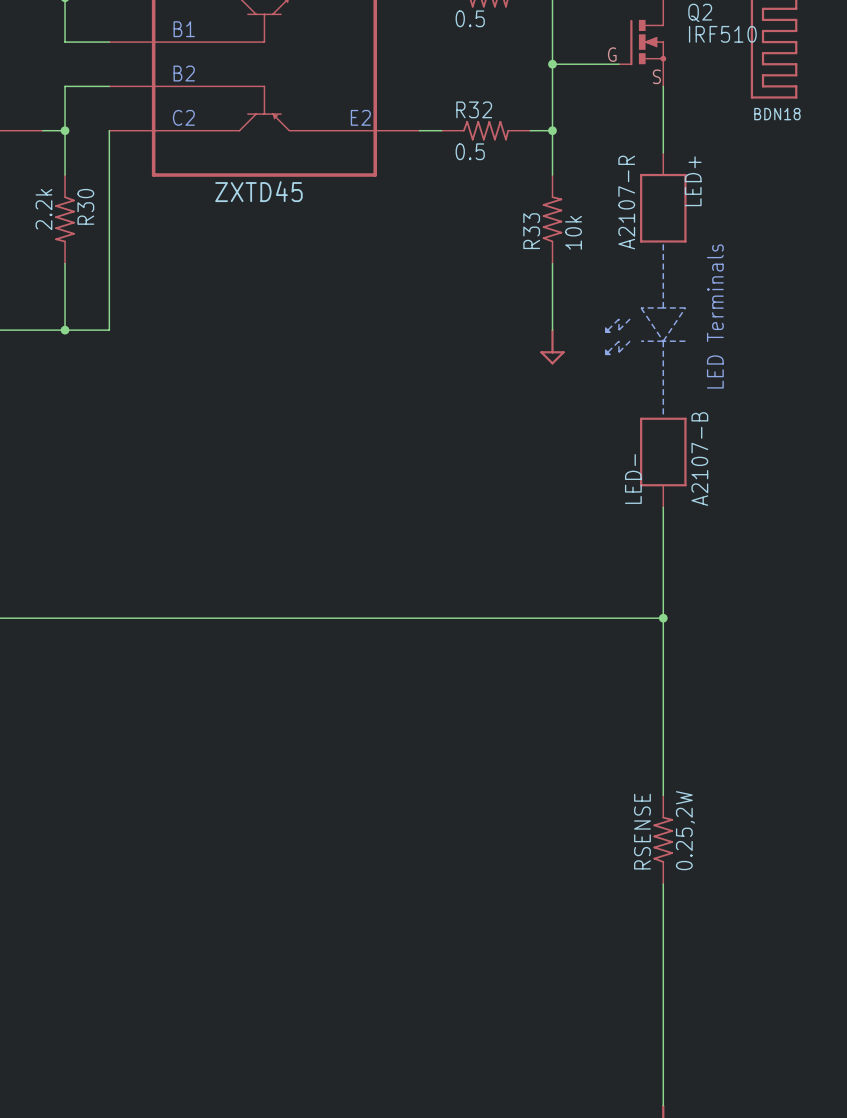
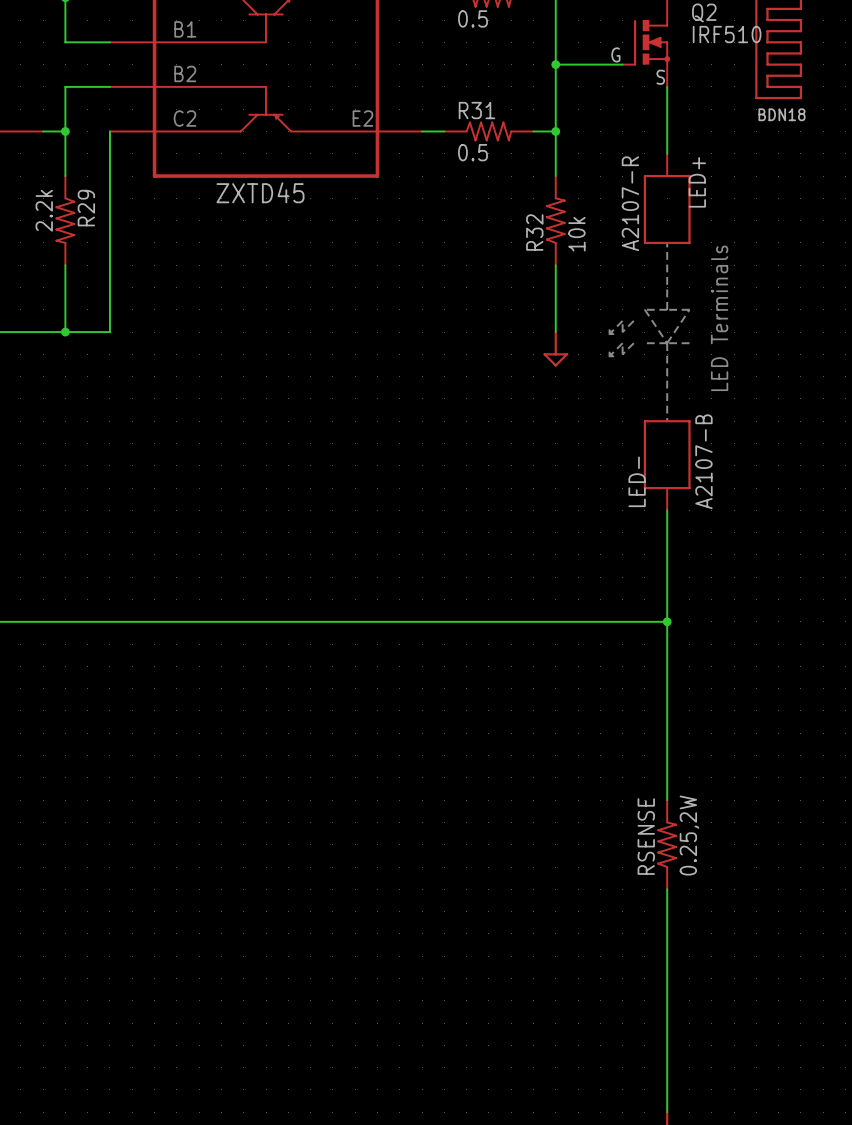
R32 name: R32 (474, 109) -> R31 (477, 110)
R30 name: R30 (85, 206) -> R29 (86, 208)
R33 name: R33 (531, 231) -> R32 (534, 232)

